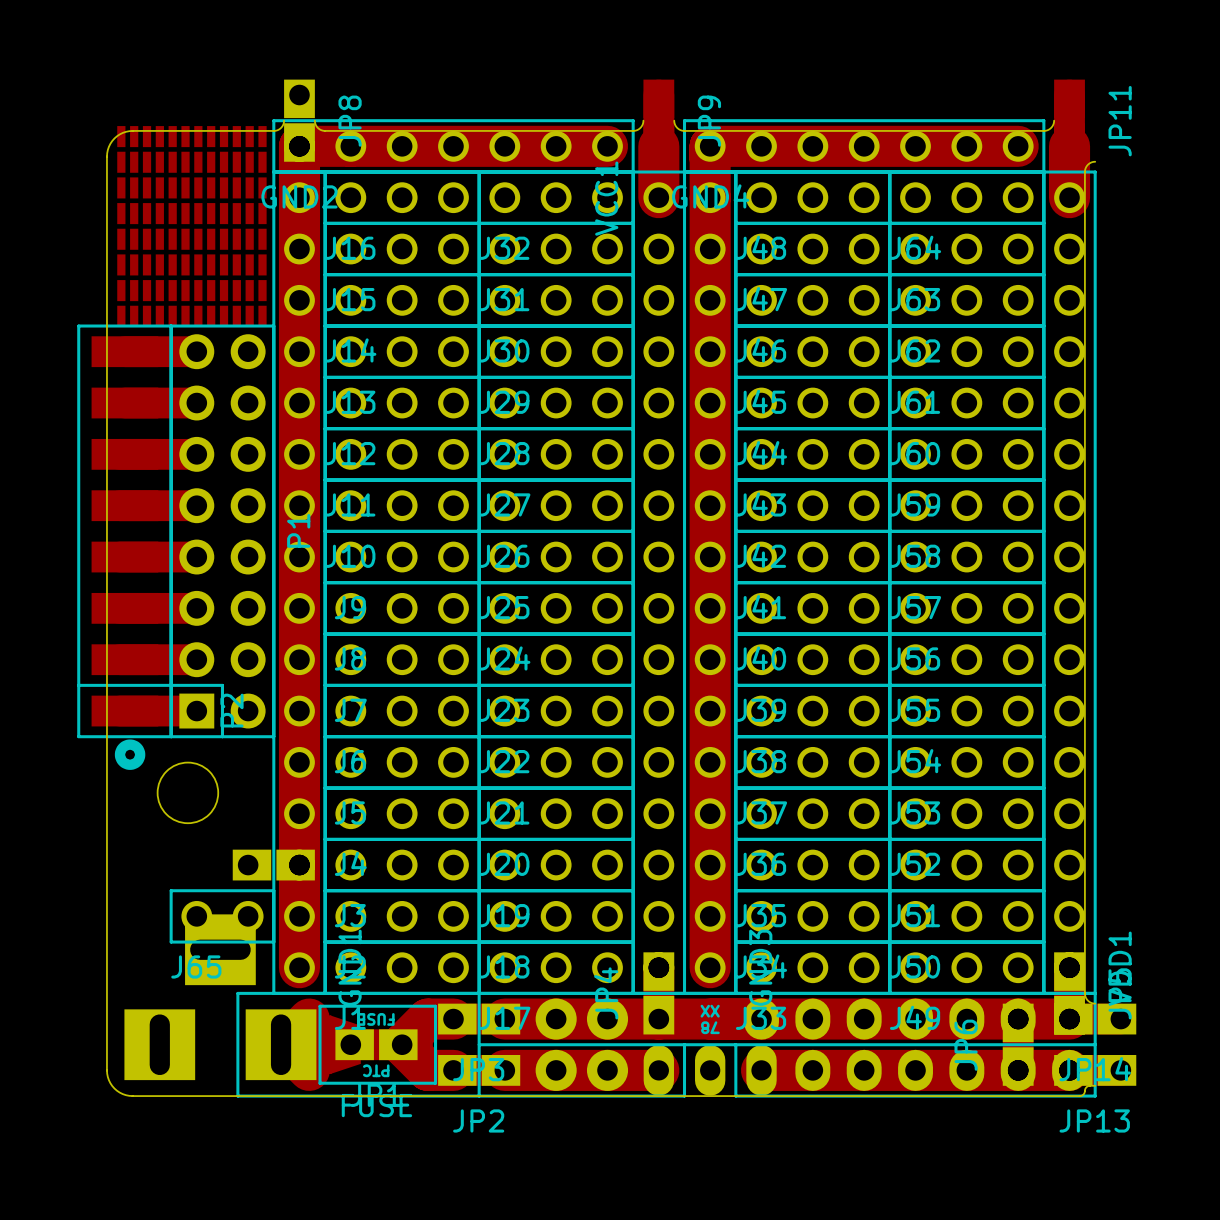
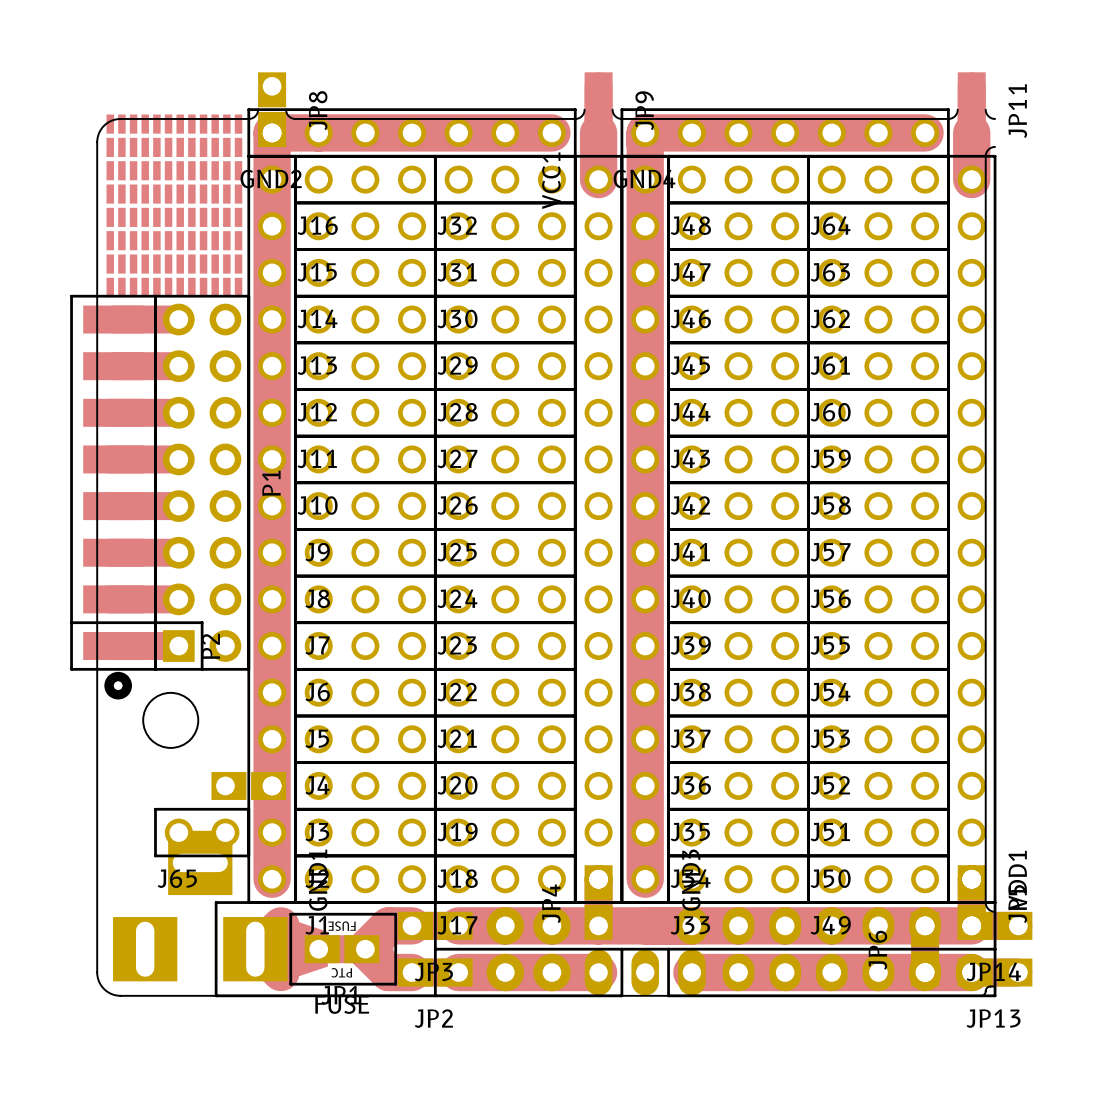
board edge: none -> (985, 109) (988, 116) (995, 118)
text: XX (710, 1011) -> none
text: 78 (710, 1027) -> none

